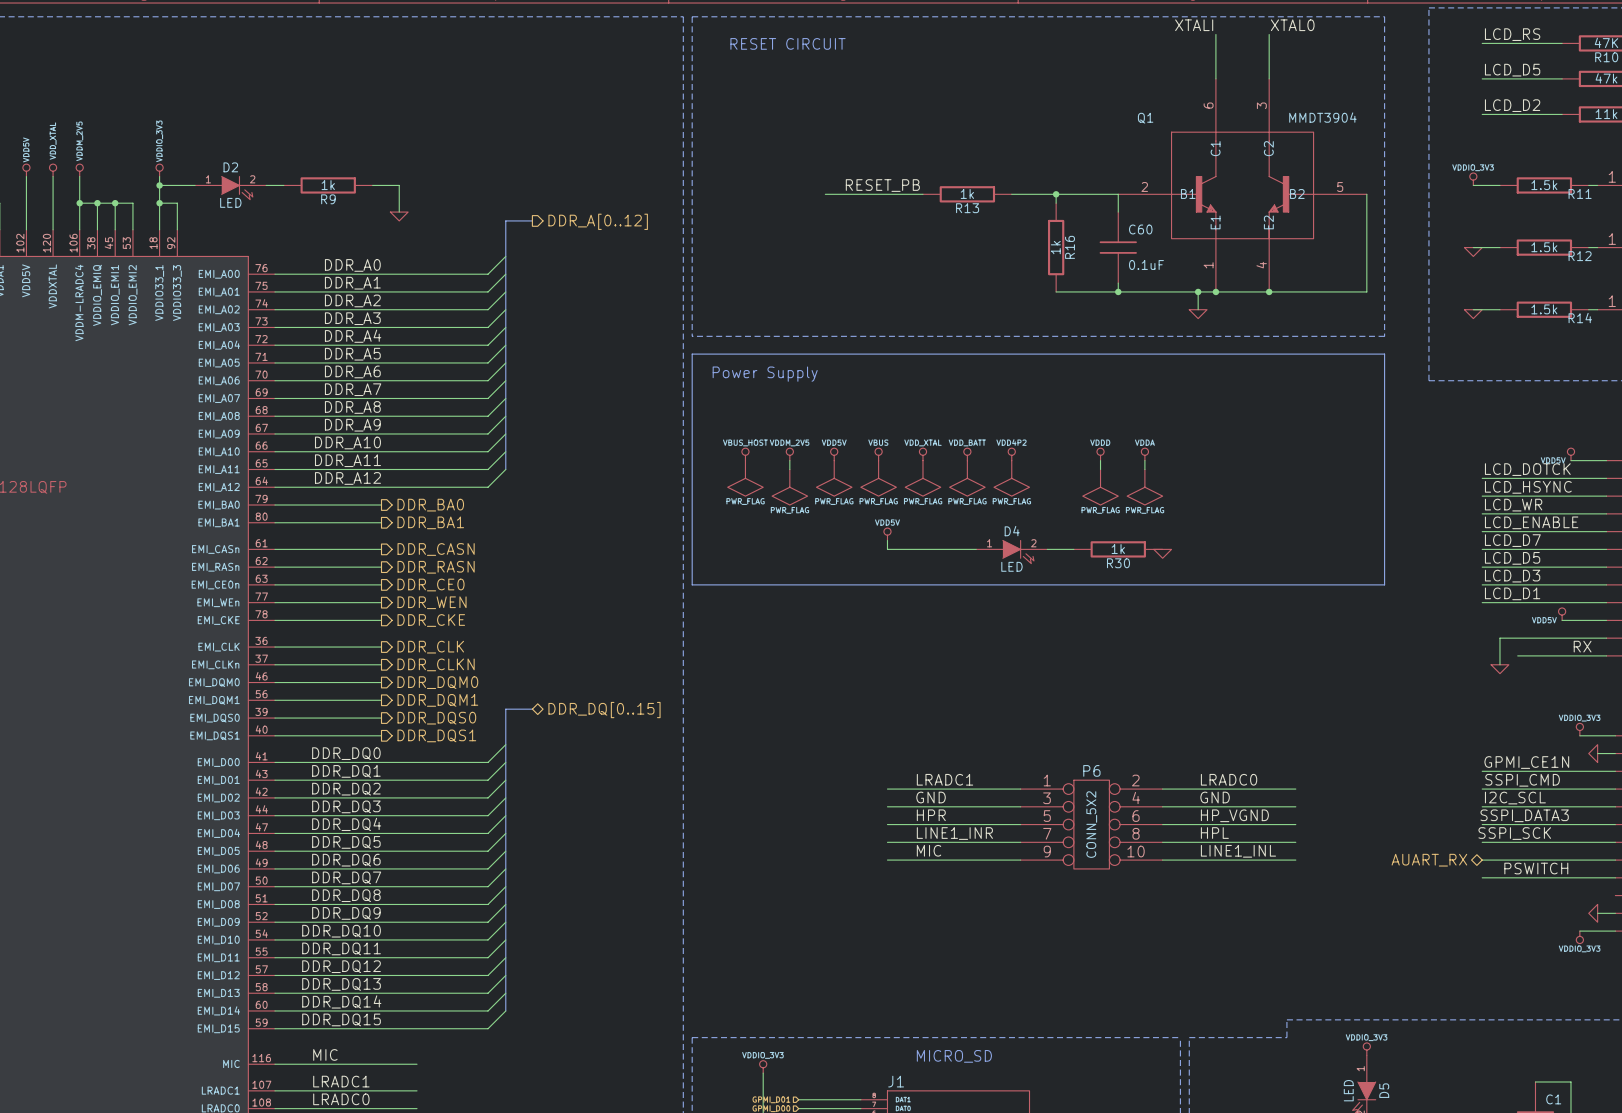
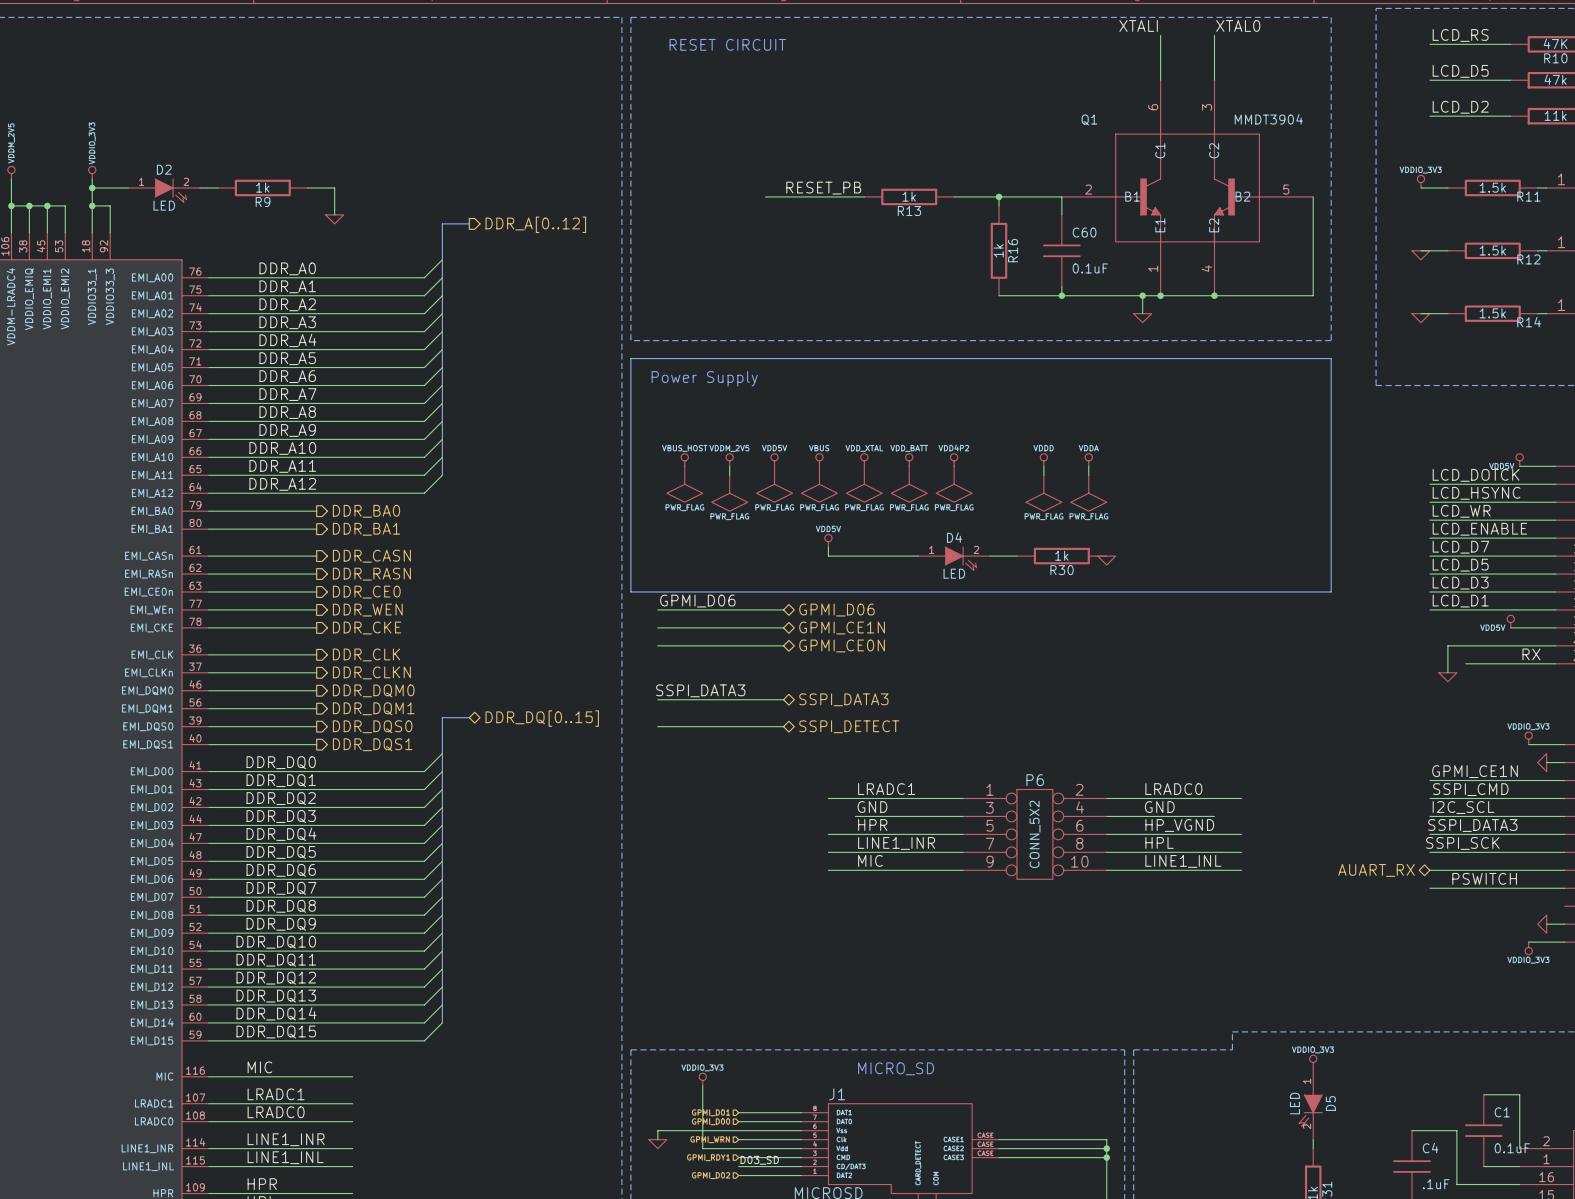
label: none -> GPMI_D06 (697, 601)
wire: none -> (657, 609) (783, 609)
hierarchical label: none -> GPMI_D06 (836, 610)
wire: none -> (657, 627) (783, 627)
hierarchical label: none -> GPMI_CE1N (842, 628)
wire: none -> (657, 645) (783, 645)
hierarchical label: none -> GPMI_CE0N (842, 645)
label: none -> SSPI_DATA3 (700, 690)
wire: none -> (657, 699) (783, 699)
hierarchical label: none -> SSPI_DATA3 (843, 699)
wire: none -> (657, 726) (783, 726)
hierarchical label: none -> SSPI_DETECT (849, 726)
wire: (887, 806) (914, 806) -> none
wire: (1269, 806) (1295, 806) -> none

